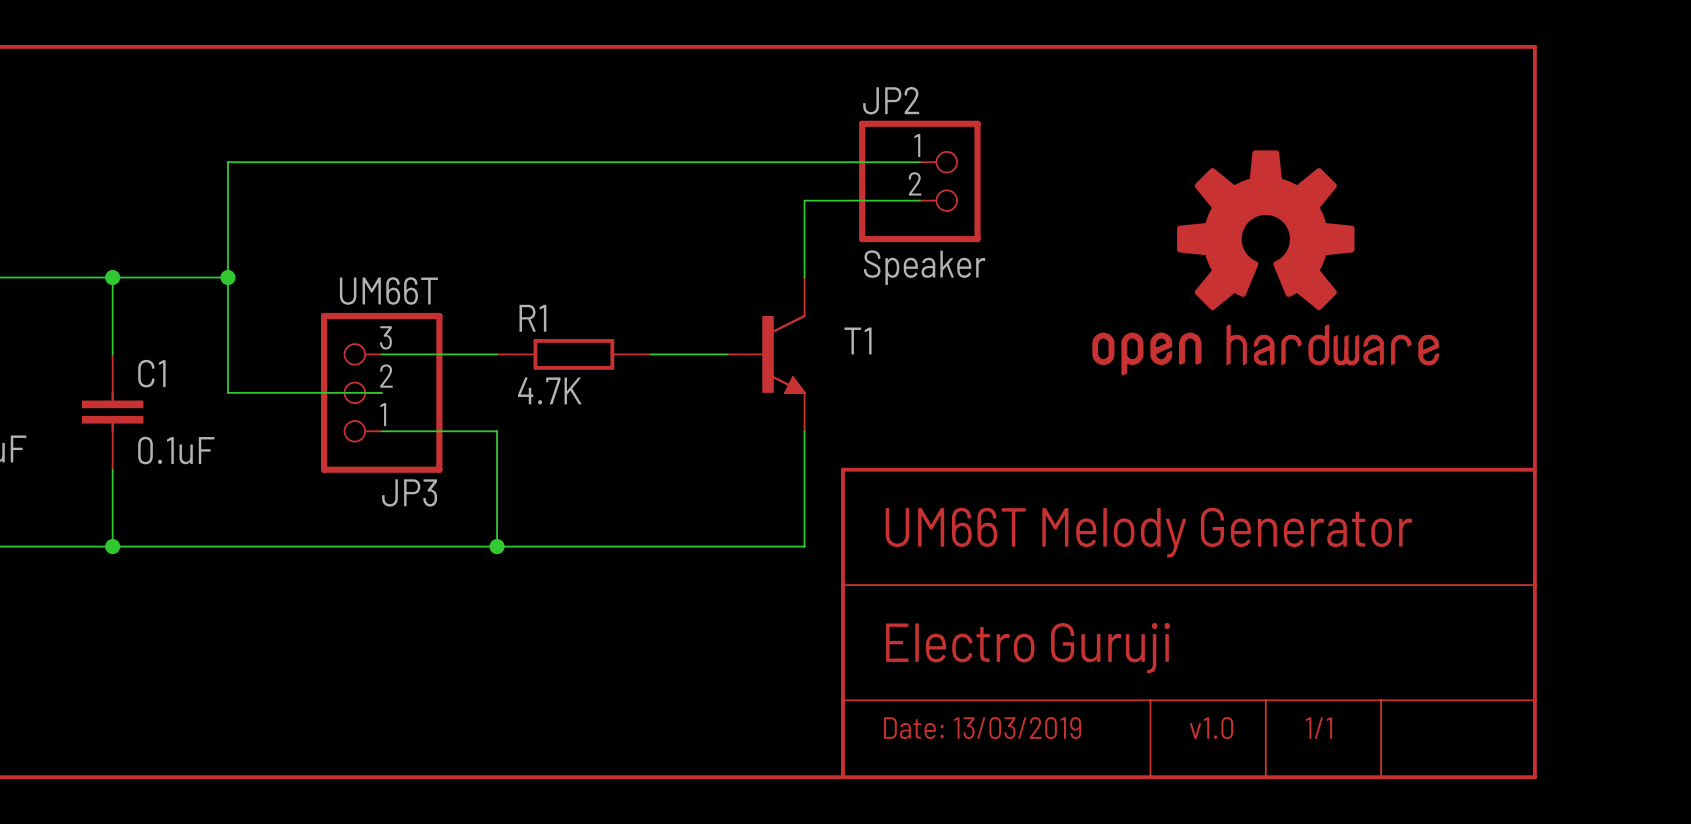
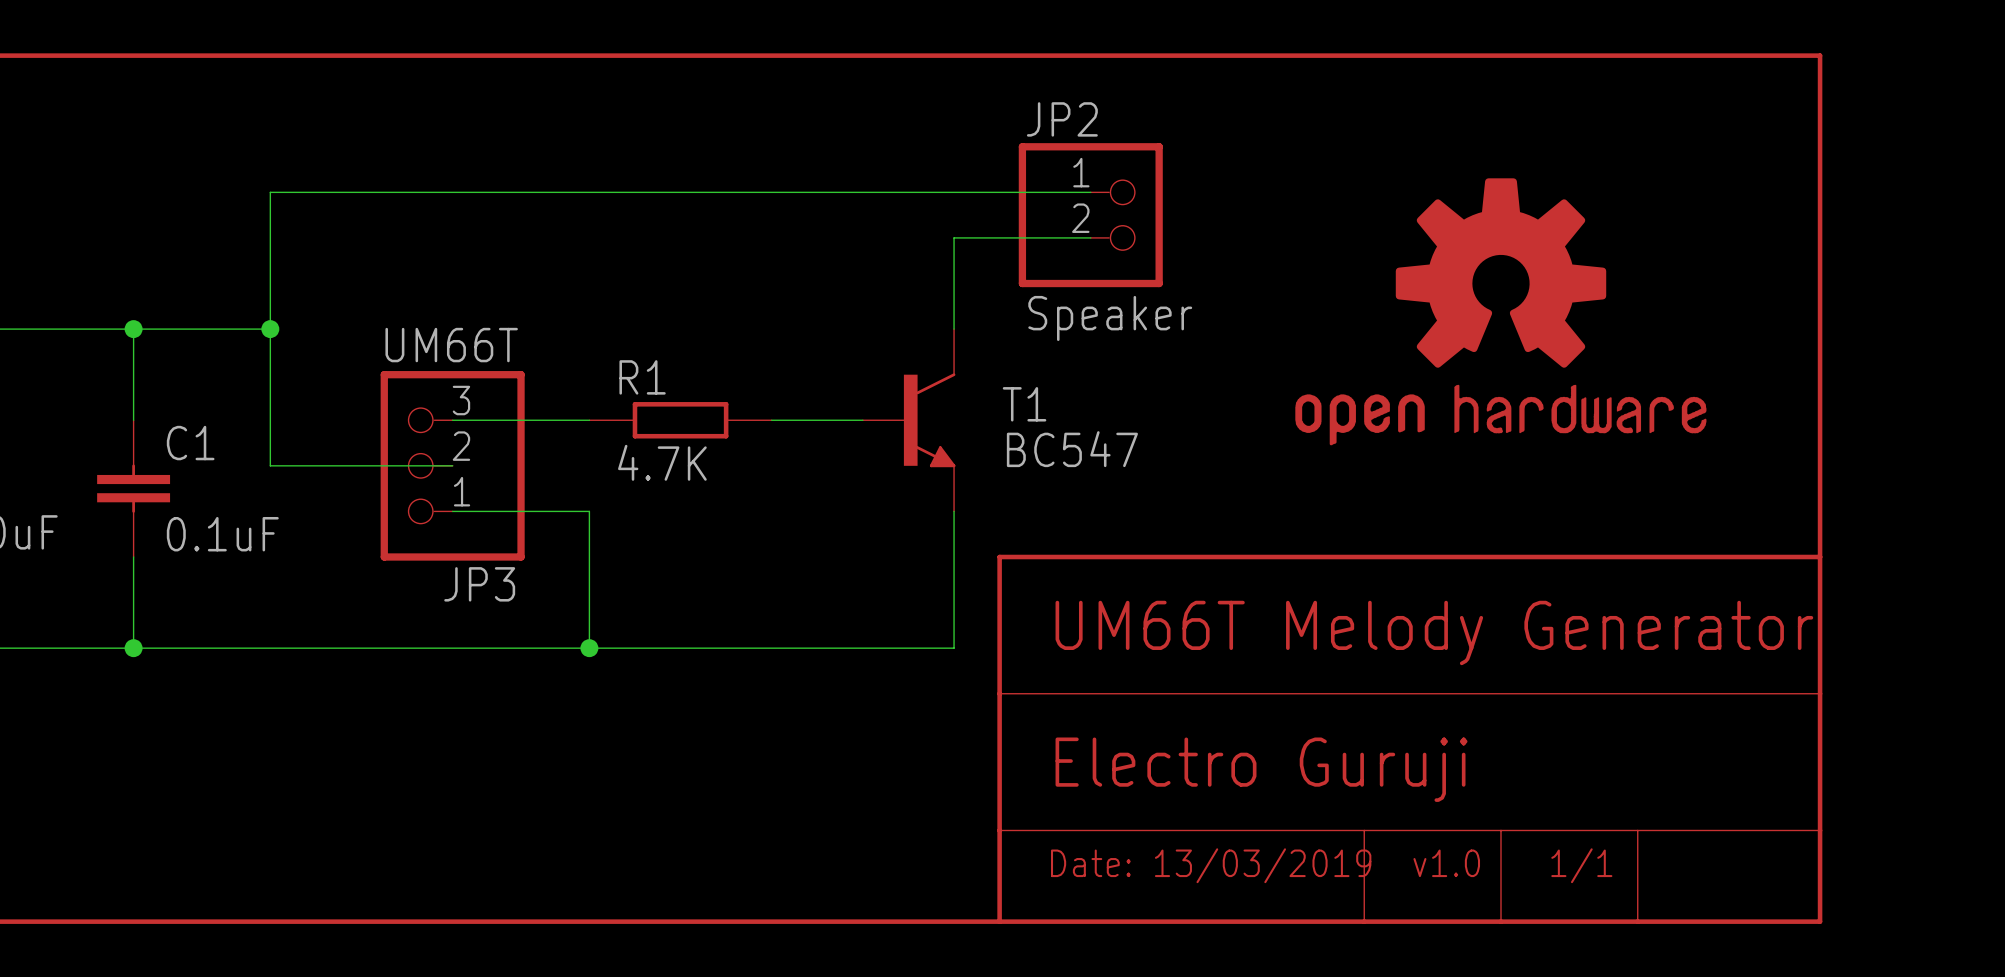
T1 value: none -> BC547 (1072, 449)

